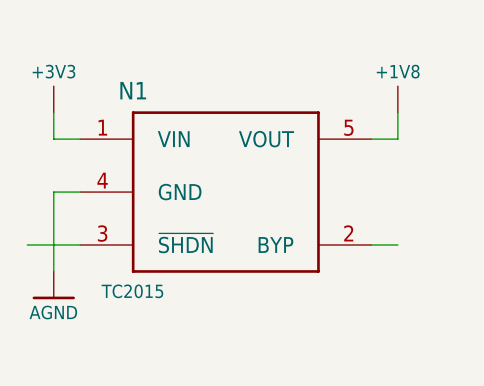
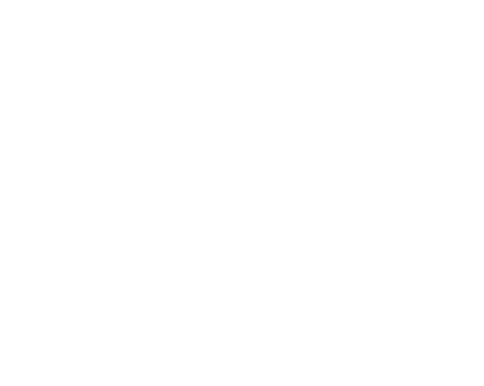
power symbol: +3V3 (53, 99) -> none
power symbol: +1V8 (397, 99) -> none
wire: (53, 112) (53, 139) (80, 139) -> none
wire: (397, 112) (397, 139) (371, 139) -> none
wire: (80, 192) (53, 192) (53, 271) -> none
N1: TC2015 (225, 192) -> none
wire: (27, 244) (80, 244) -> none
wire: (371, 244) (397, 244) -> none
power symbol: AGND (53, 285) -> none

